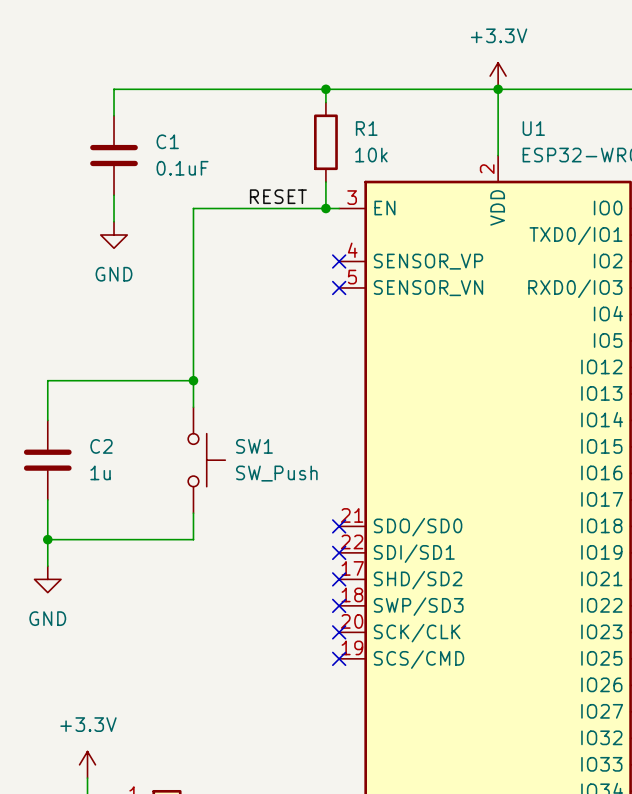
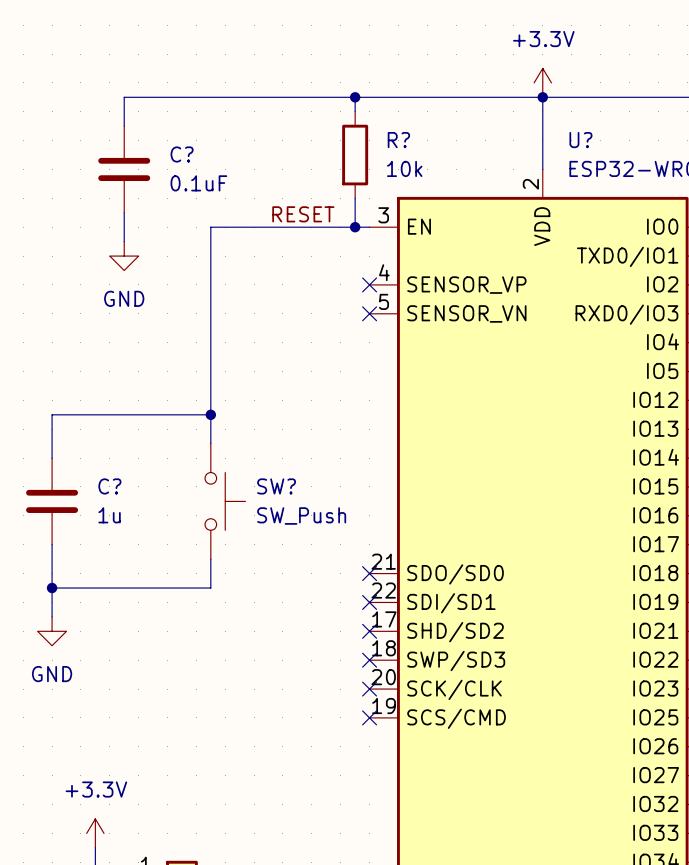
R1 name: R1 (366, 128) -> R? (398, 140)
U1 name: U1 (533, 128) -> U? (580, 140)
C1 name: C1 (167, 141) -> C? (182, 154)
C2 name: C2 (101, 446) -> C? (109, 486)
SW1 name: SW1 (254, 446) -> SW? (276, 486)

